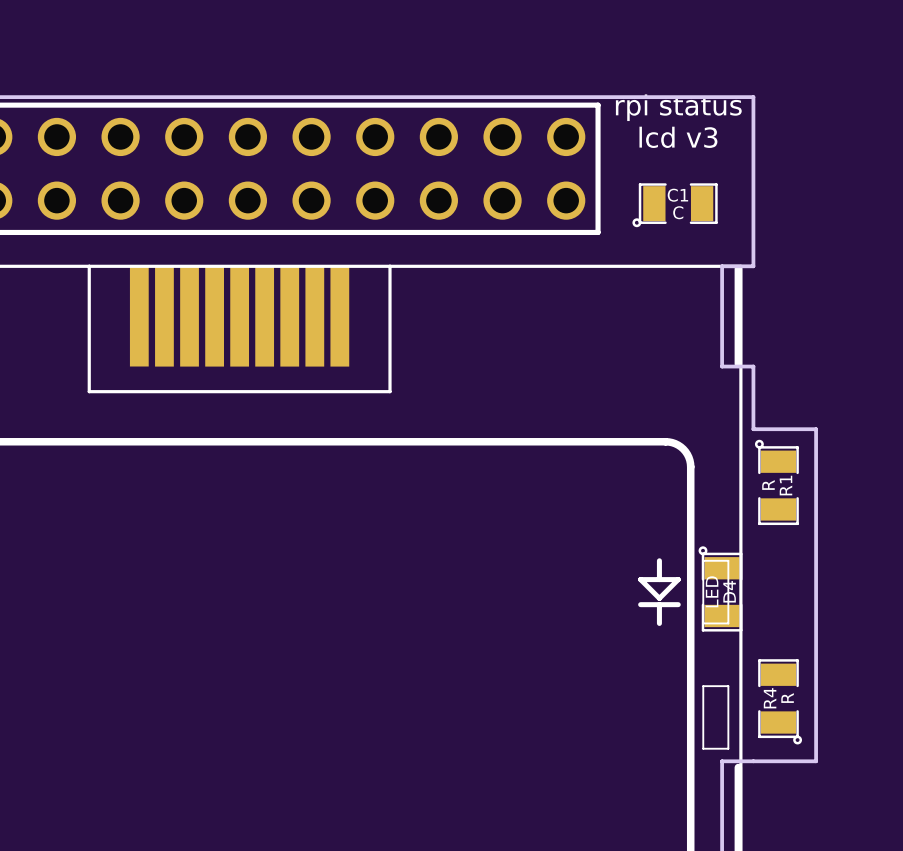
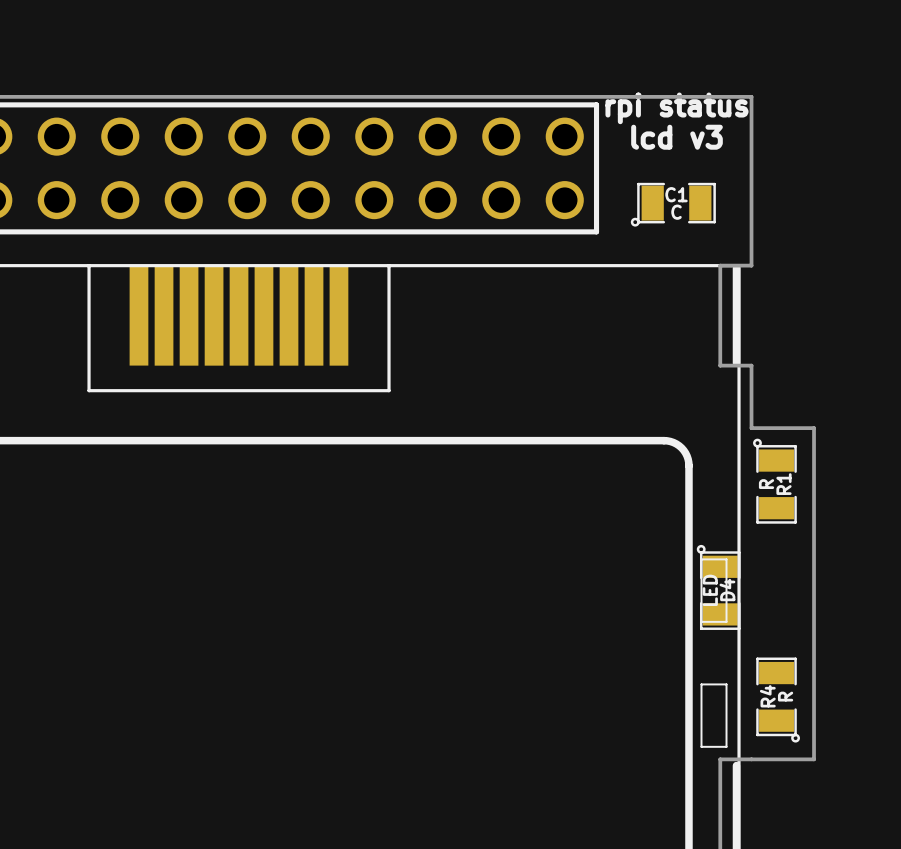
line: (659, 560) (659, 579) -> none
line: (640, 579) (659, 598) (678, 579) (640, 579) -> none
line: (640, 604) (678, 604) -> none
line: (659, 604) (659, 623) -> none

